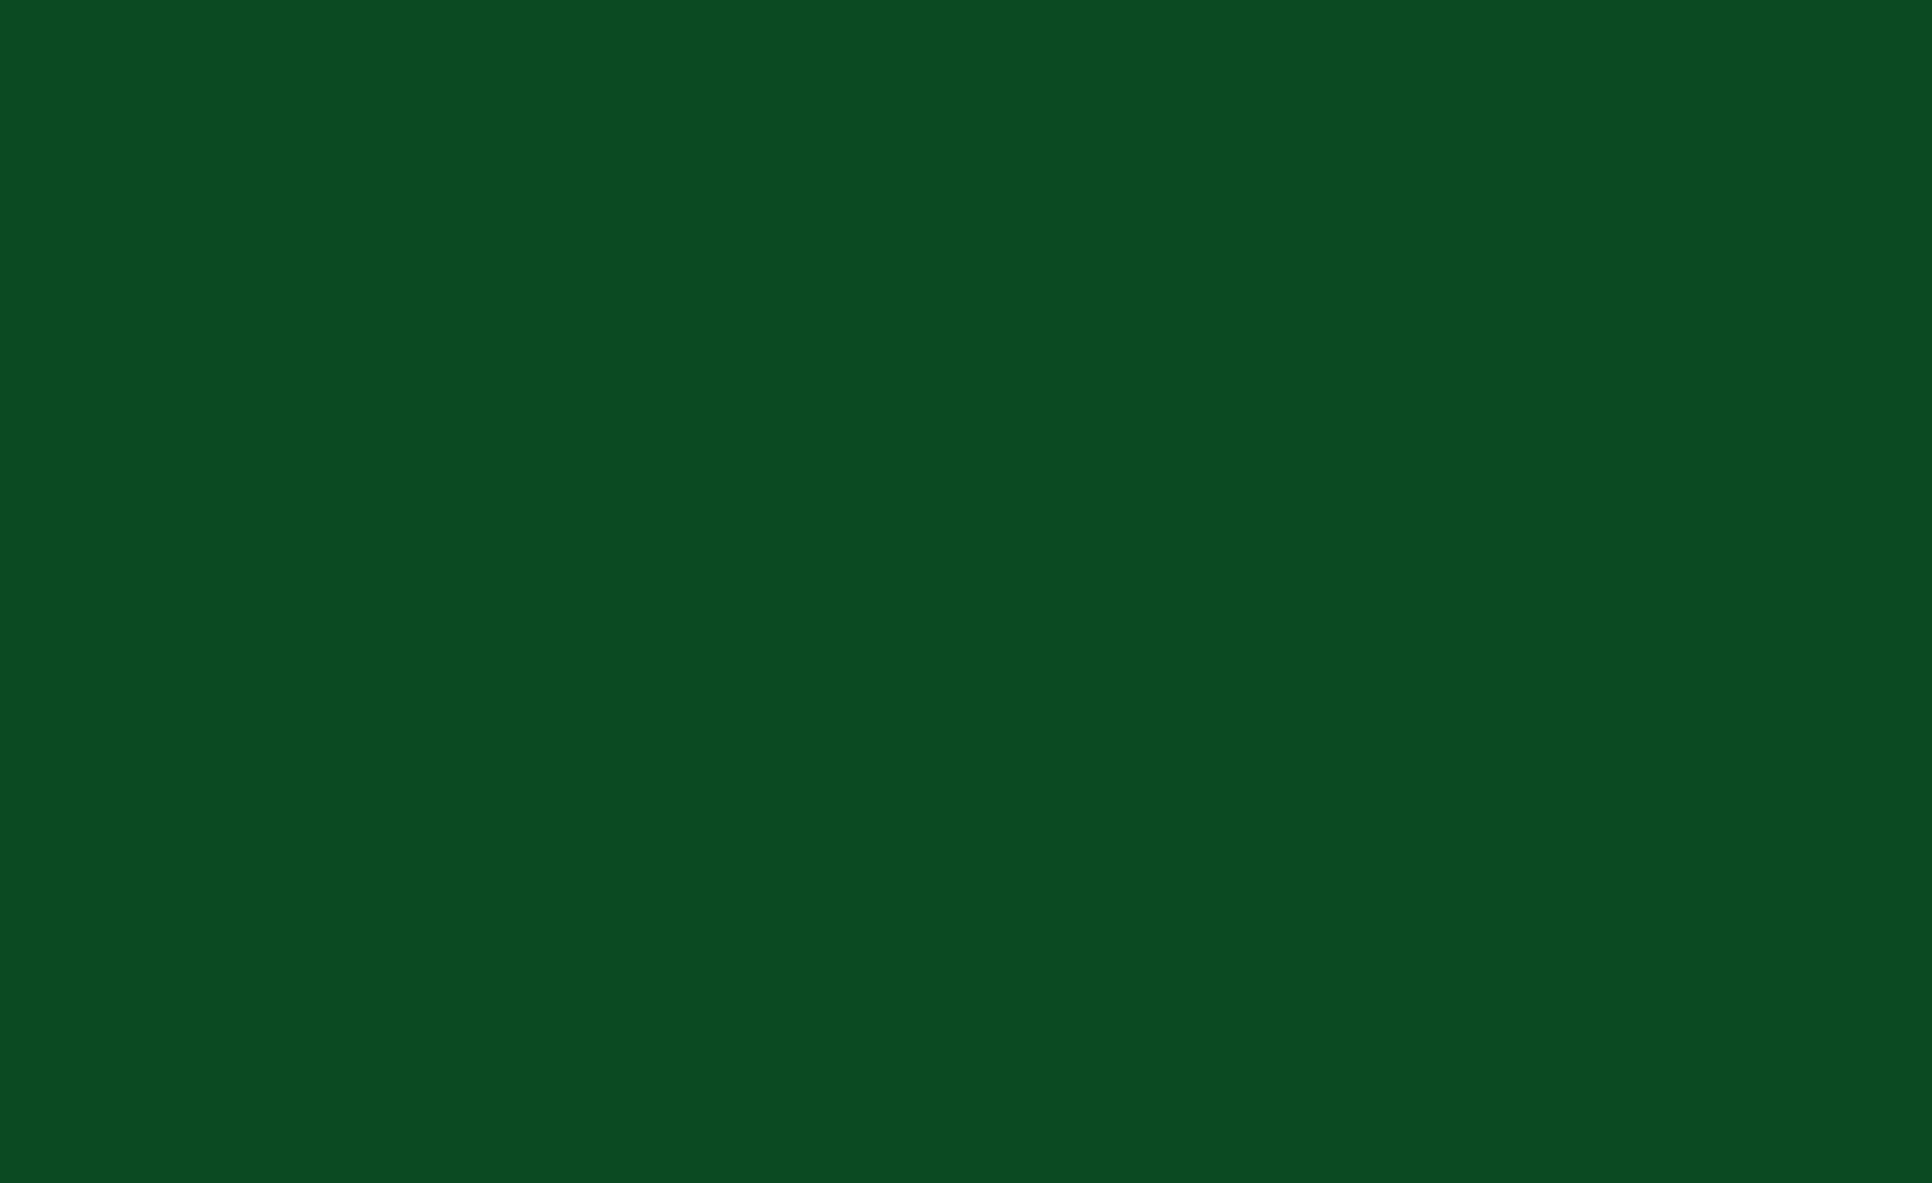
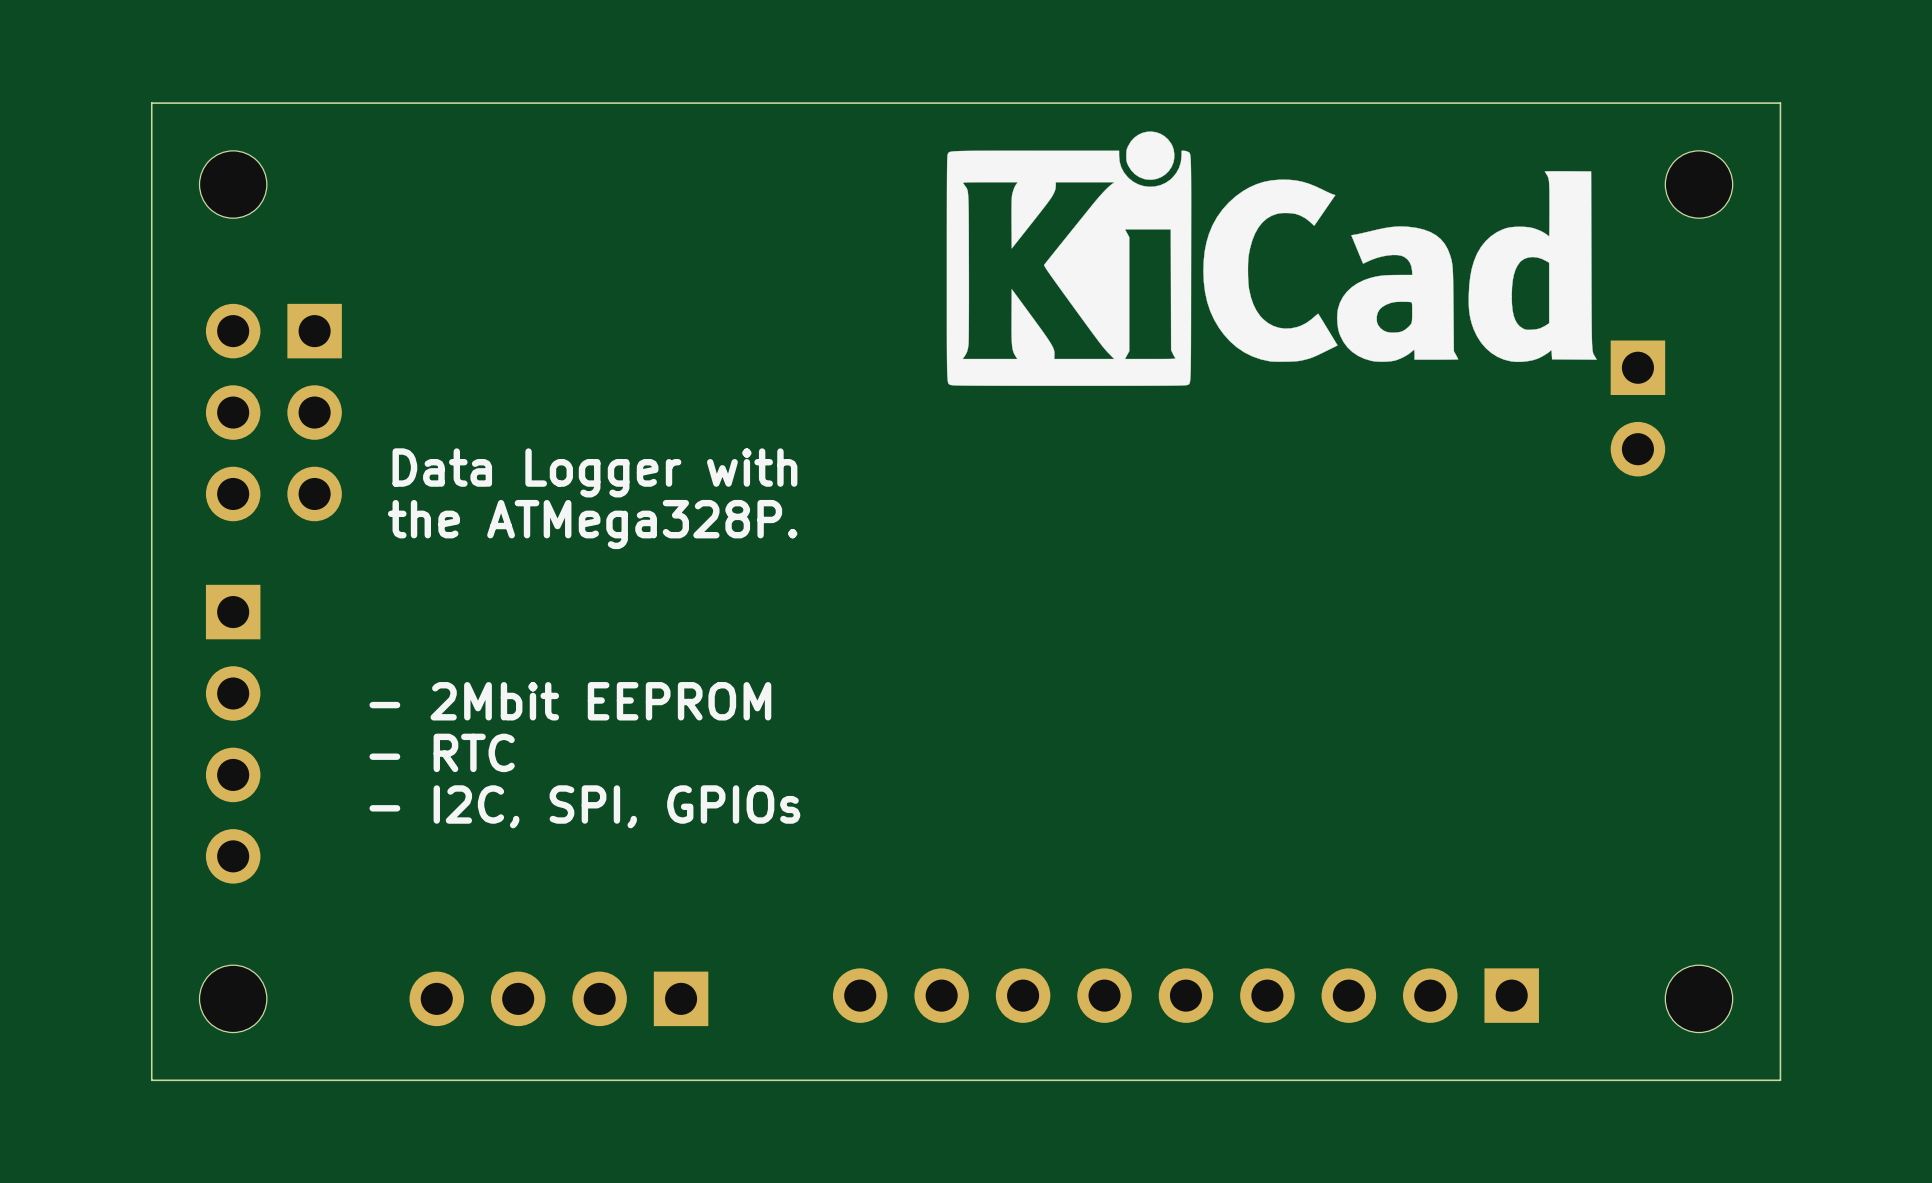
board edge: none -> (1780, 103) (151, 103) (151, 1080) (1780, 1080) (1780, 103)
drawing: none -> [946, 131, 1597, 386]
part: none -> (233, 184)
part: none -> (1699, 184)
part: none -> (1637, 408)
part: none -> (273, 412)
text: none -> Data Logger with (594, 472)
text: none -> the ATMega328P. (592, 524)
text: none -> - 2Mbit EEPROM (570, 701)
part: none -> (233, 734)
text: none -> - RTC (442, 752)
text: none -> - I2C, SPI, GPIOs (584, 806)
part: none -> (1185, 995)
part: none -> (233, 998)
part: none -> (558, 998)
part: none -> (1699, 998)

